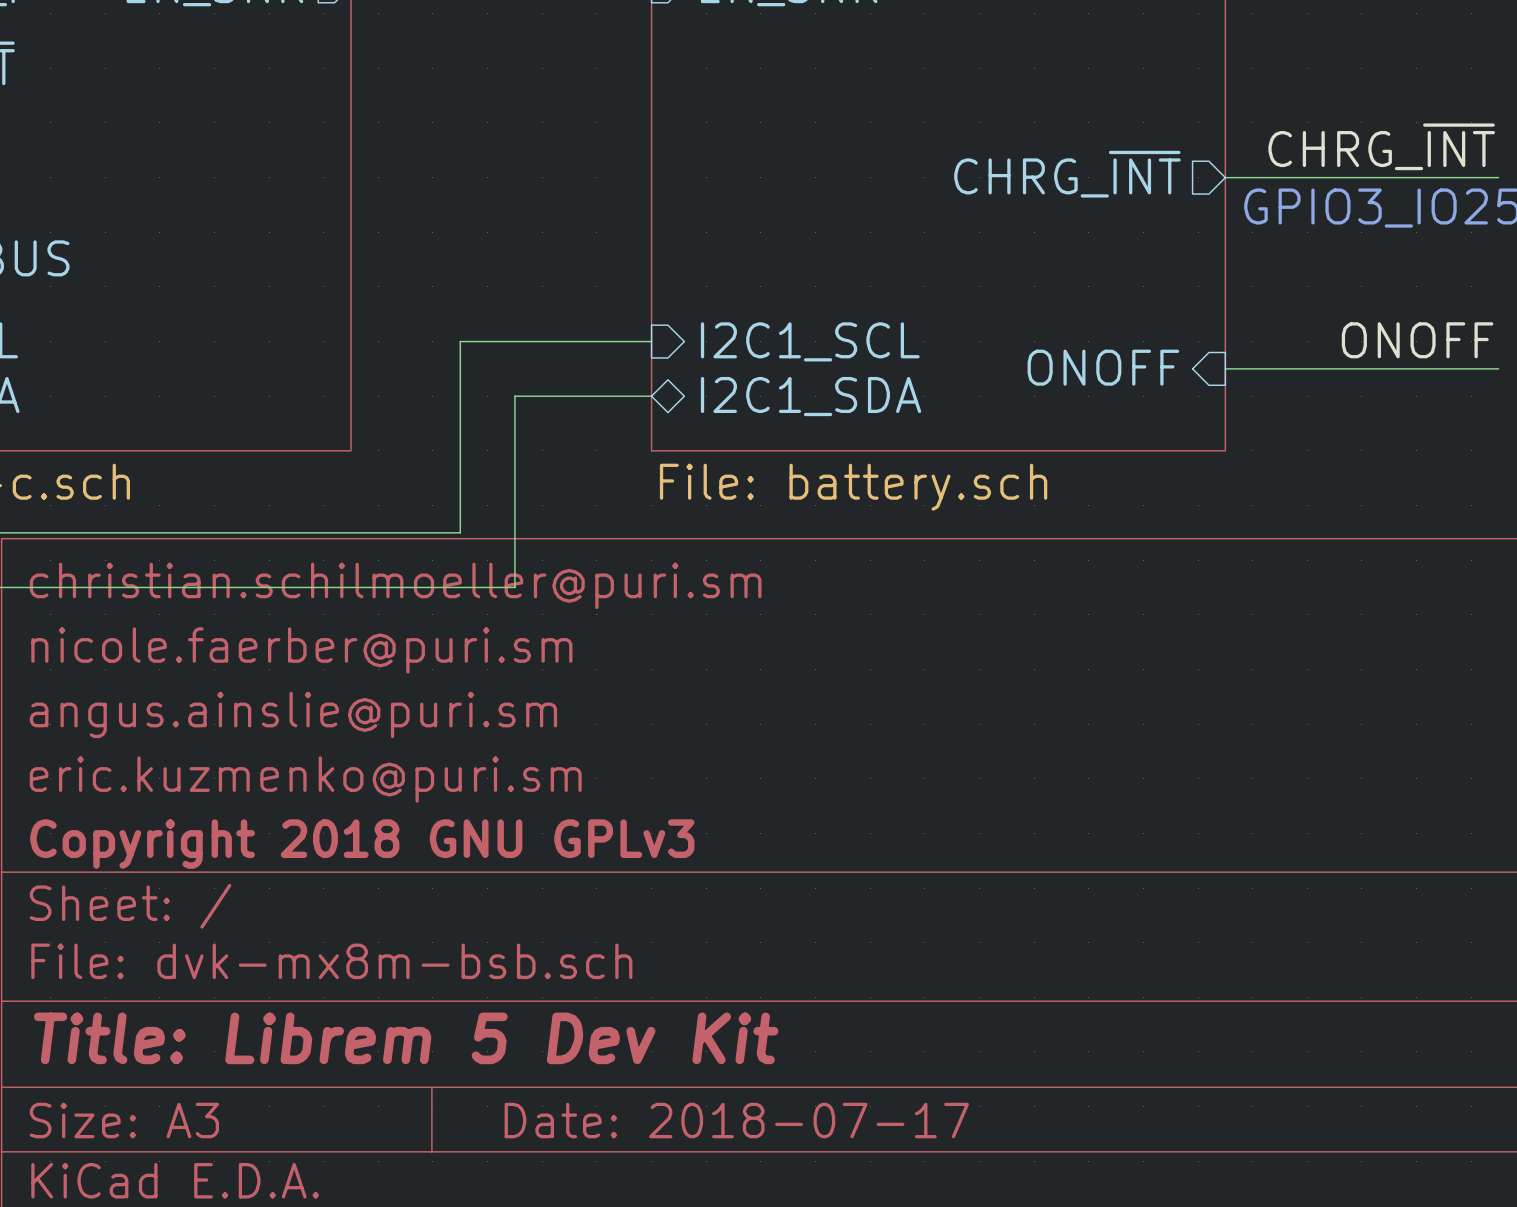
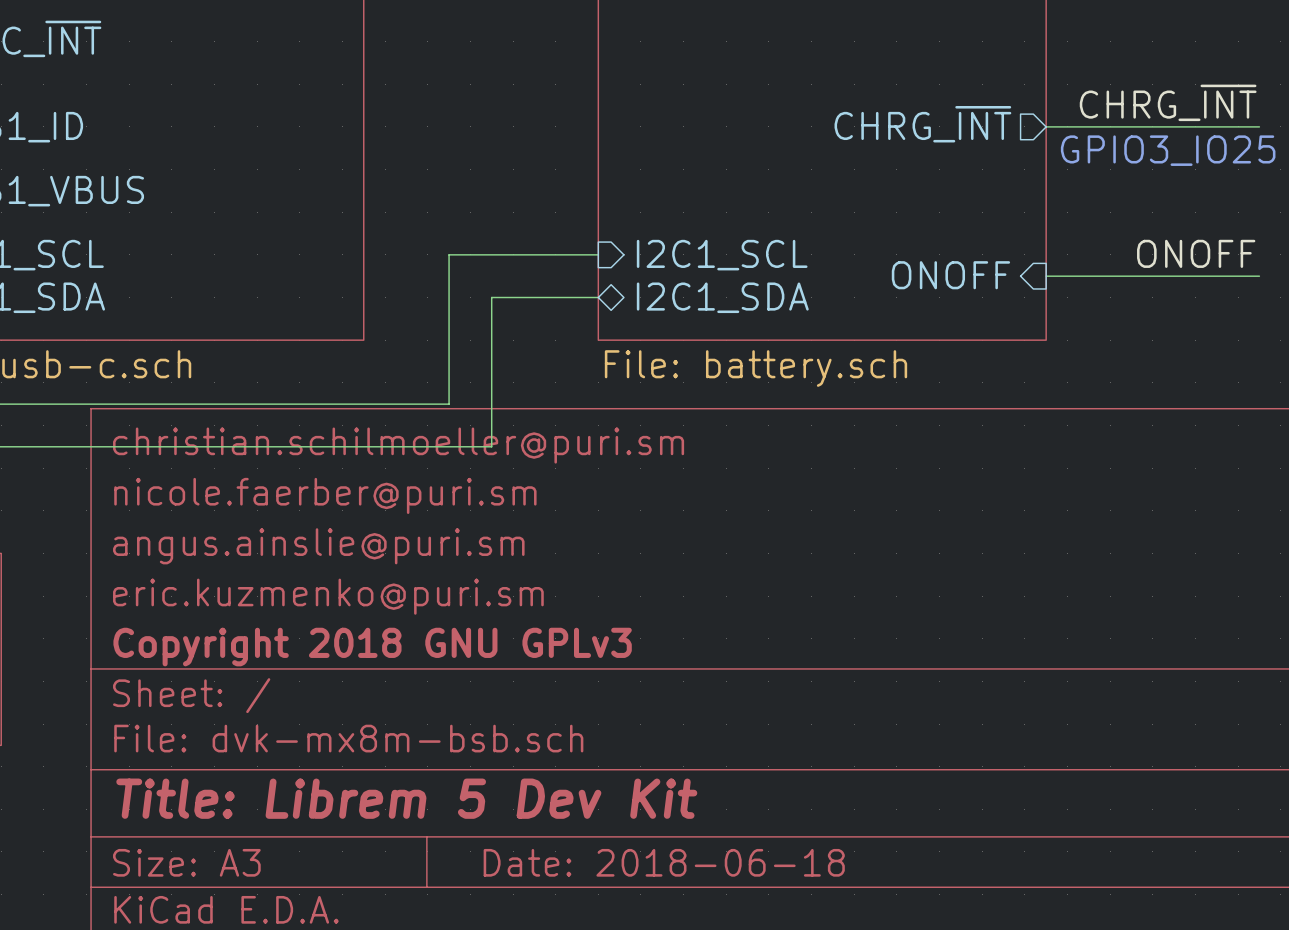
title block: Date: 2018-07-17 (736, 1120) -> Date: 2018-06-18 (664, 862)

